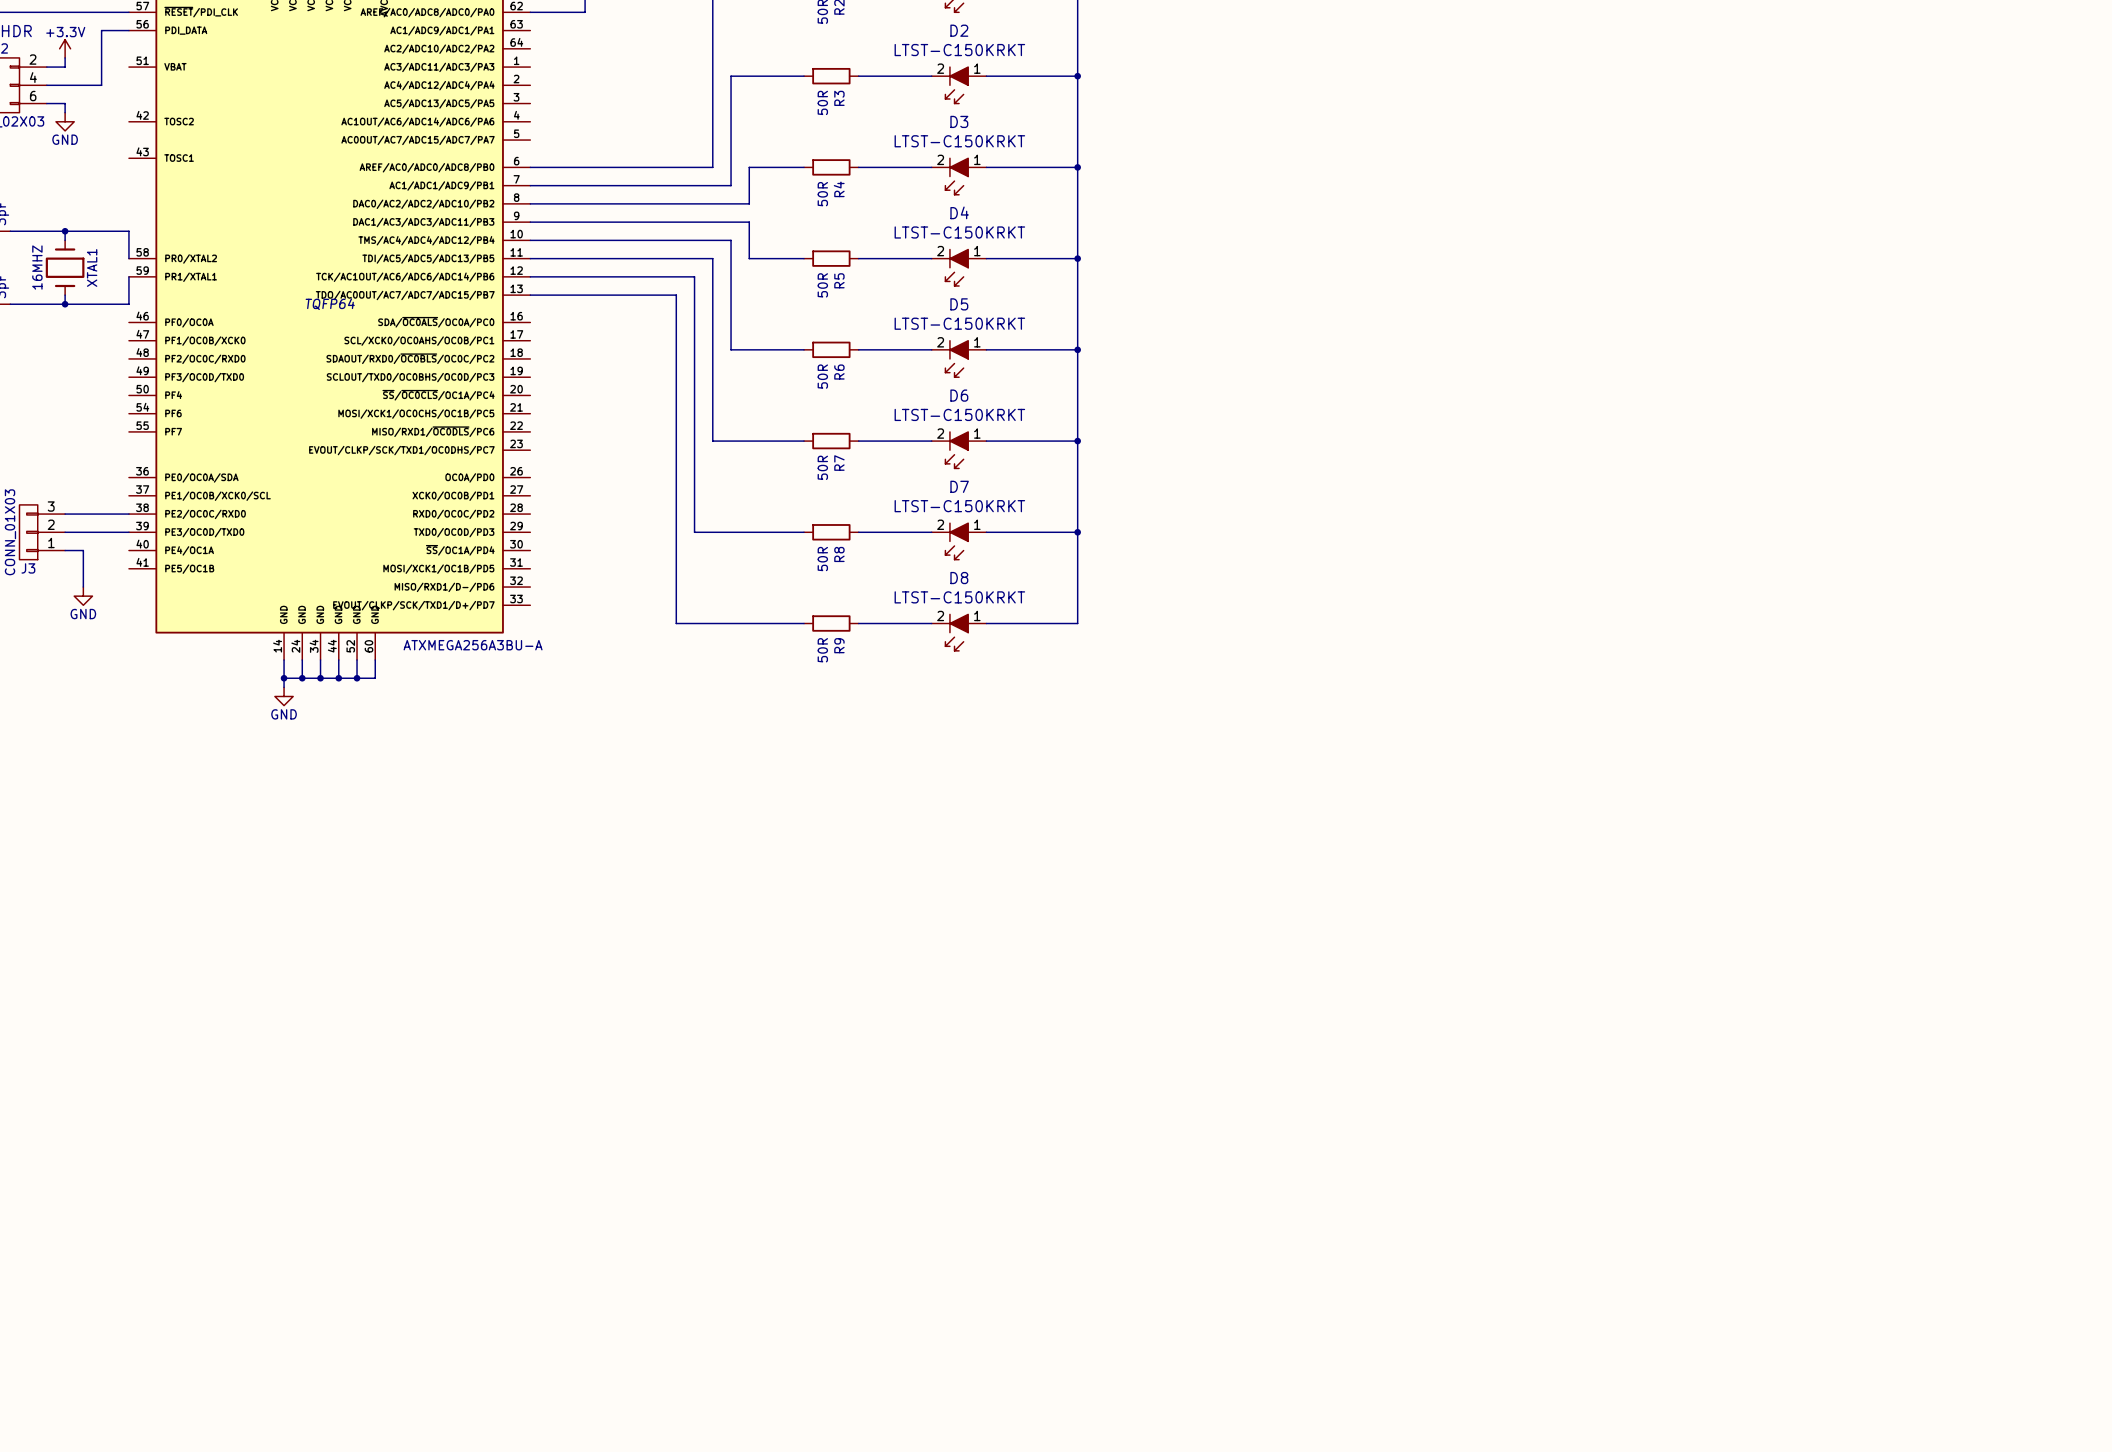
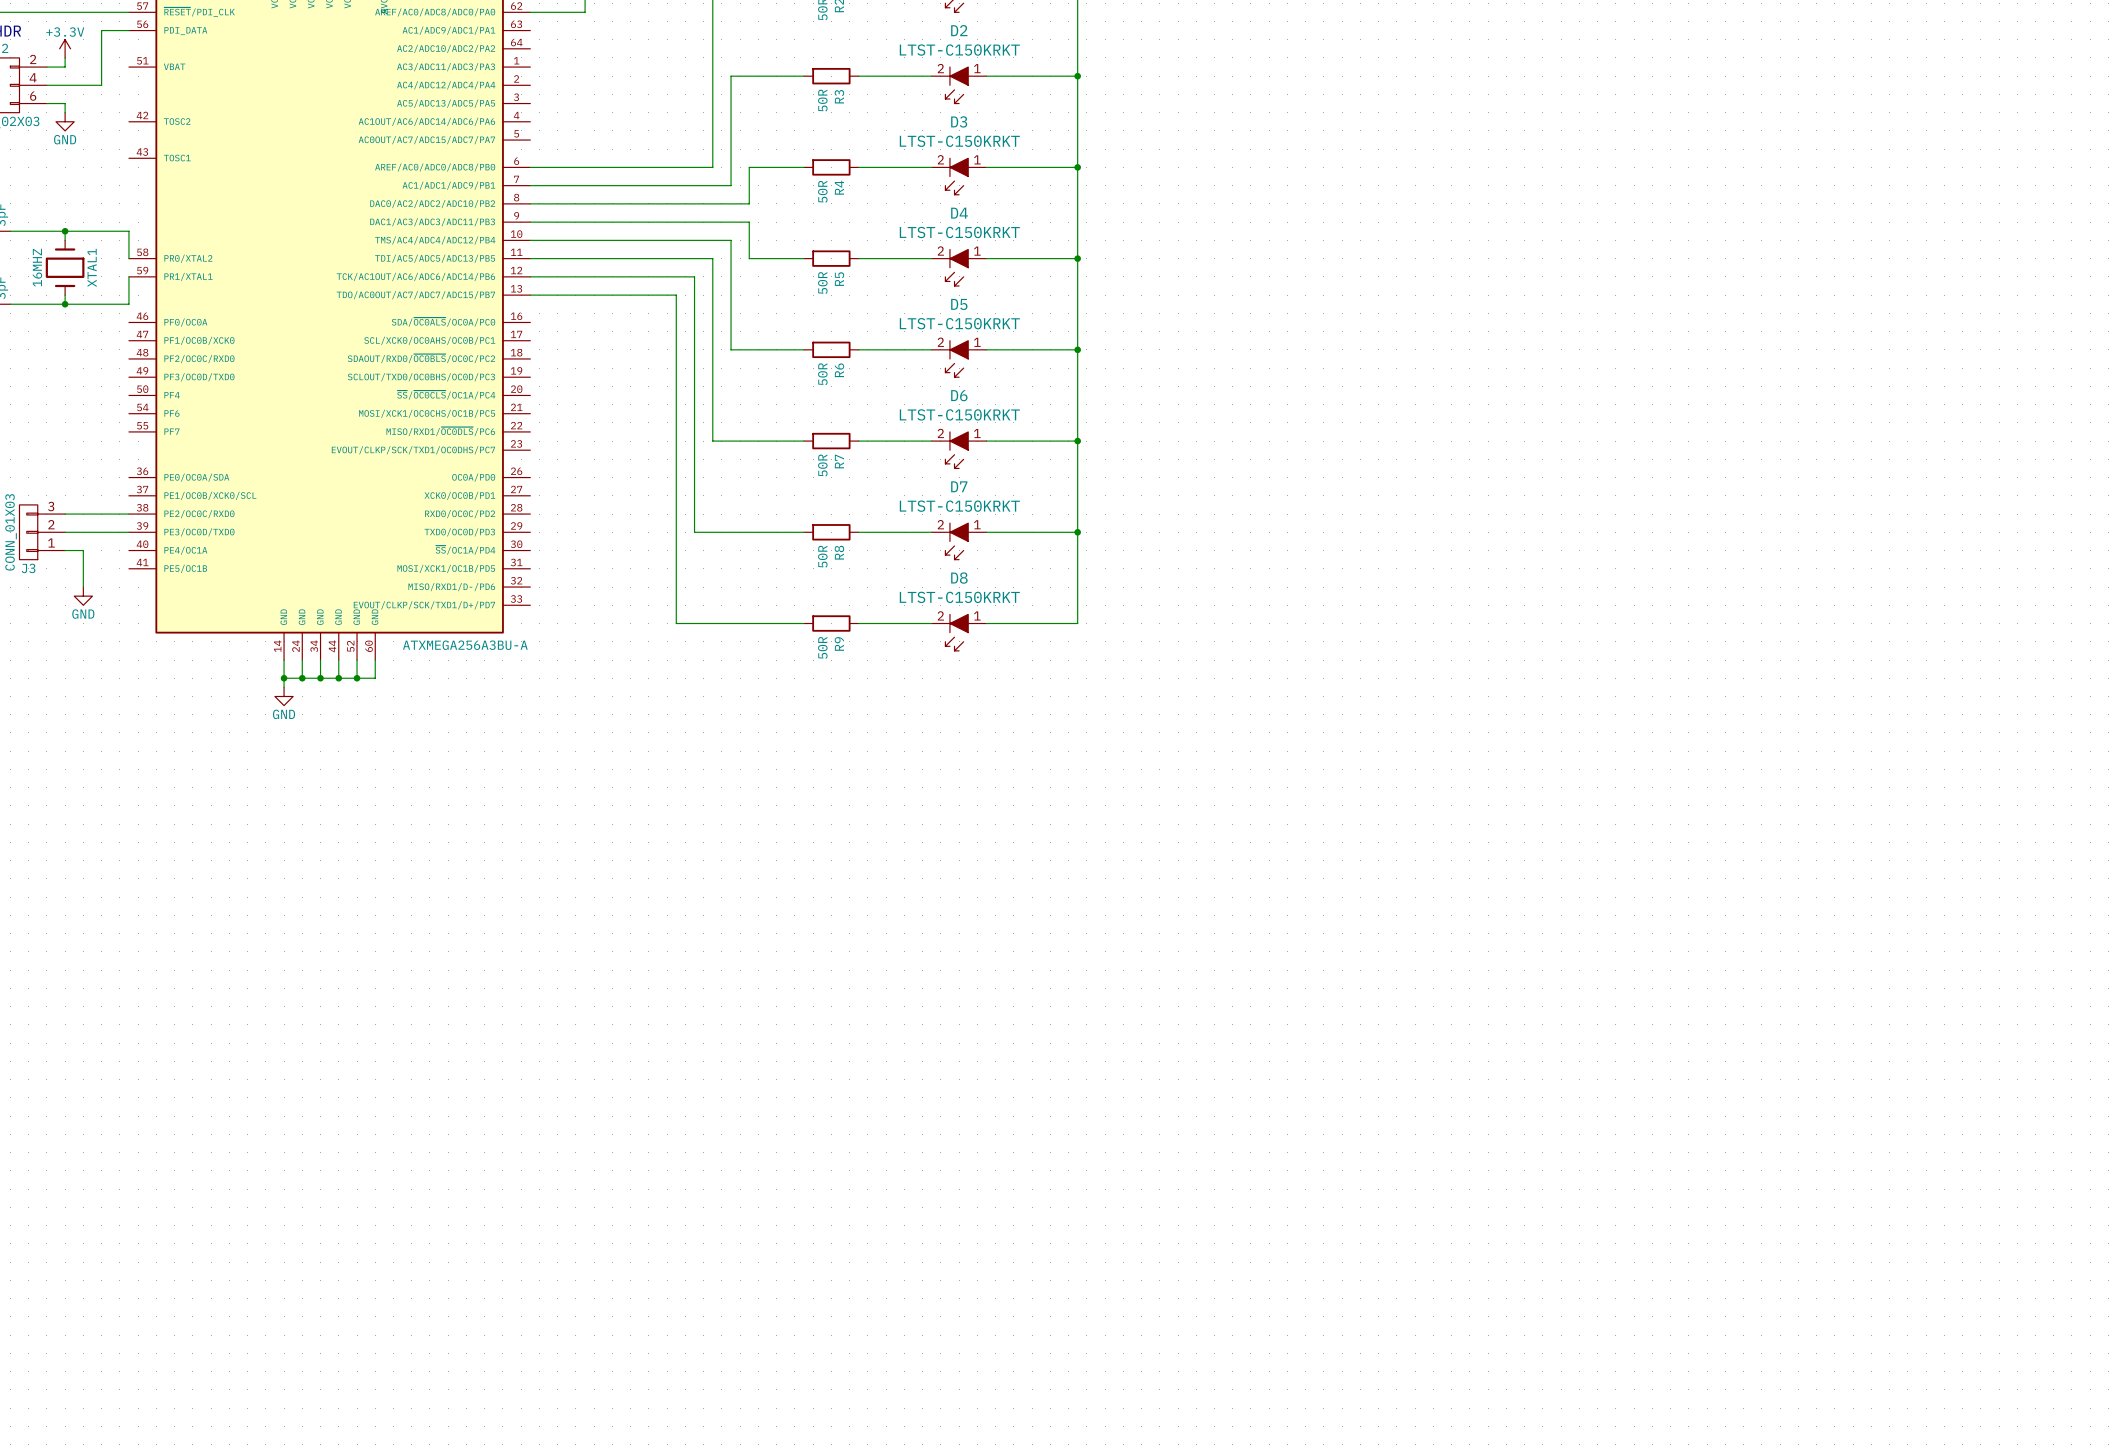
part text: TQFP64 (330, 304) -> none

